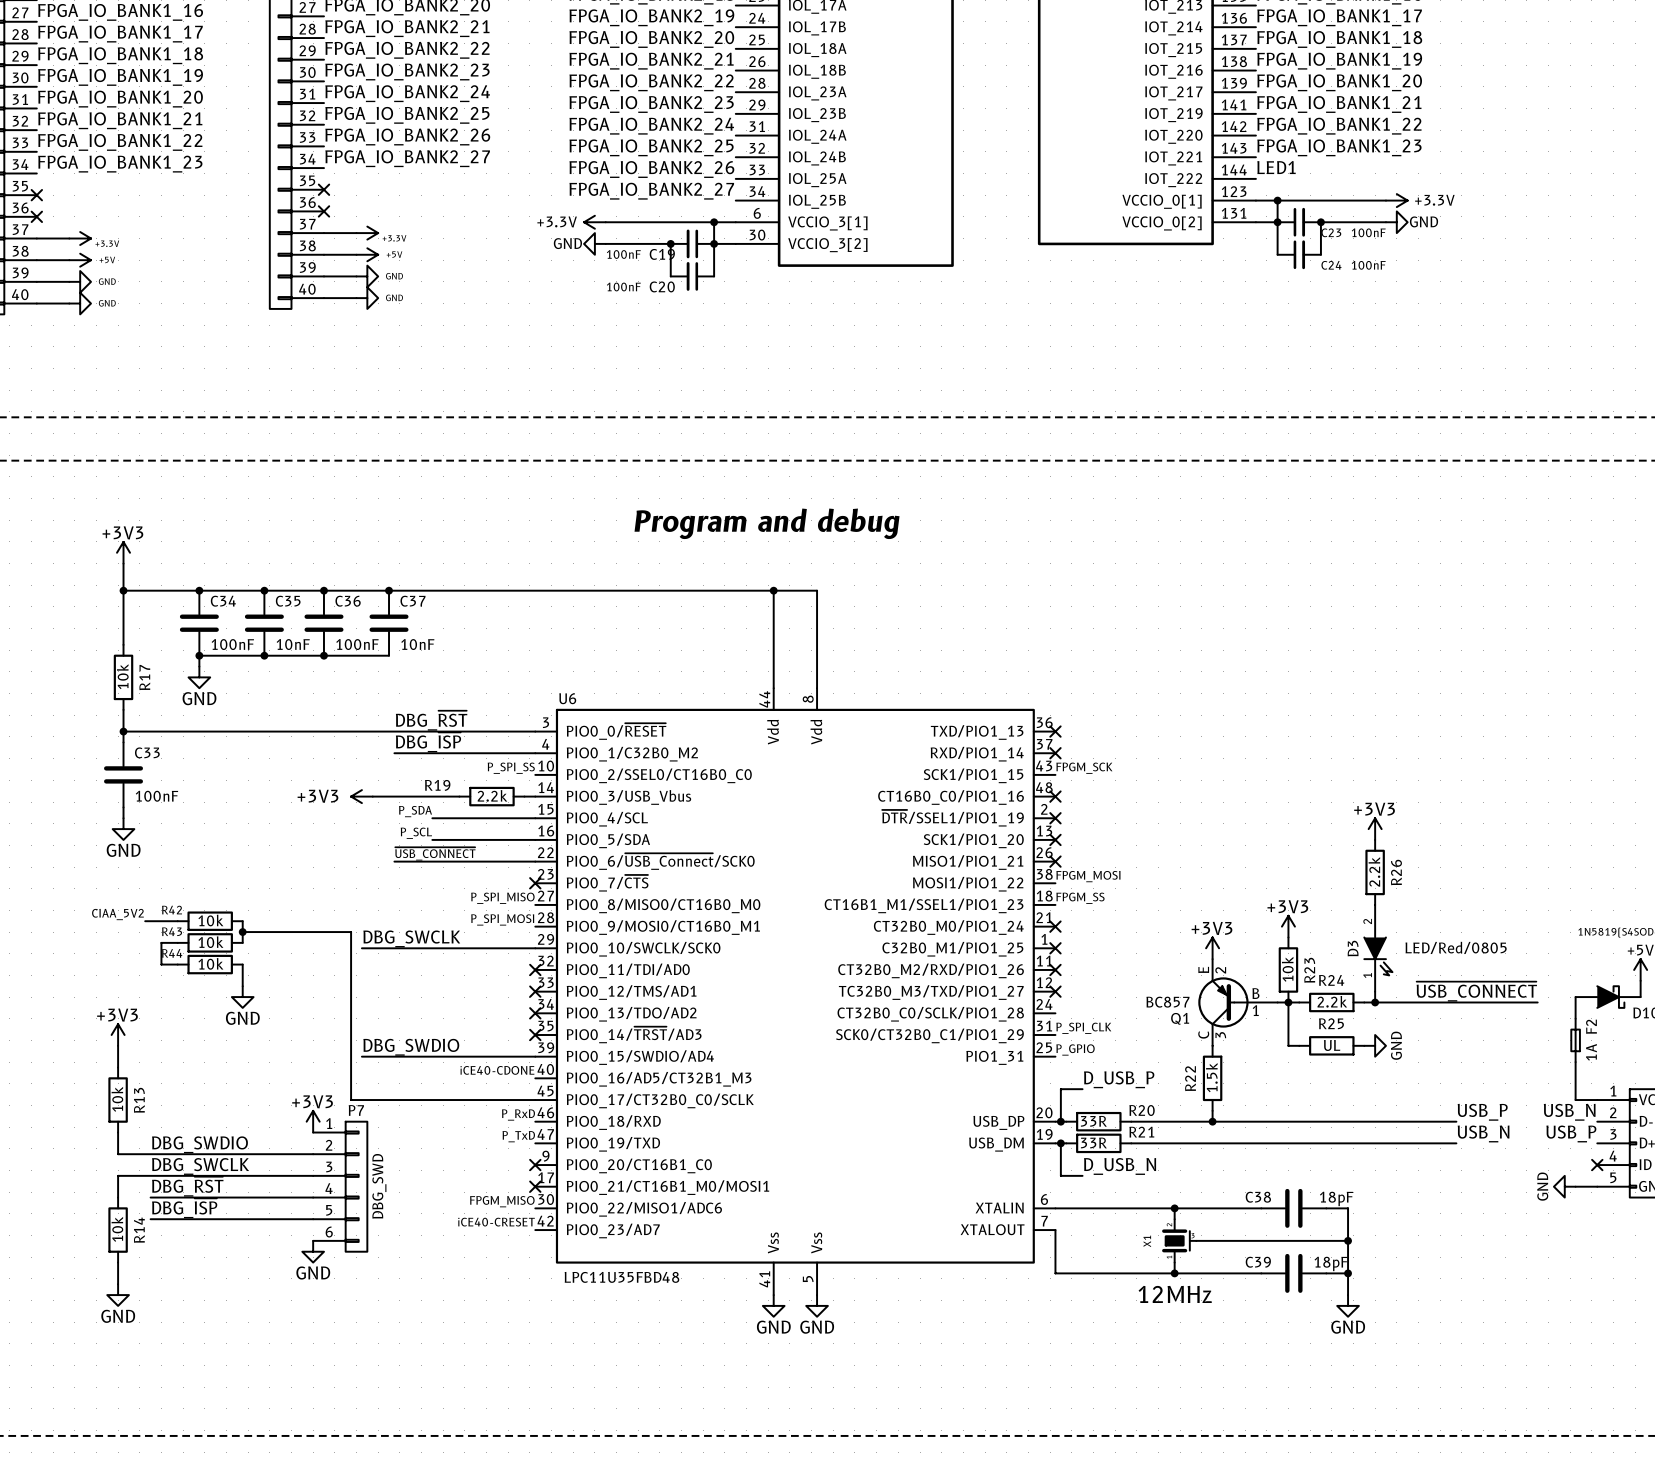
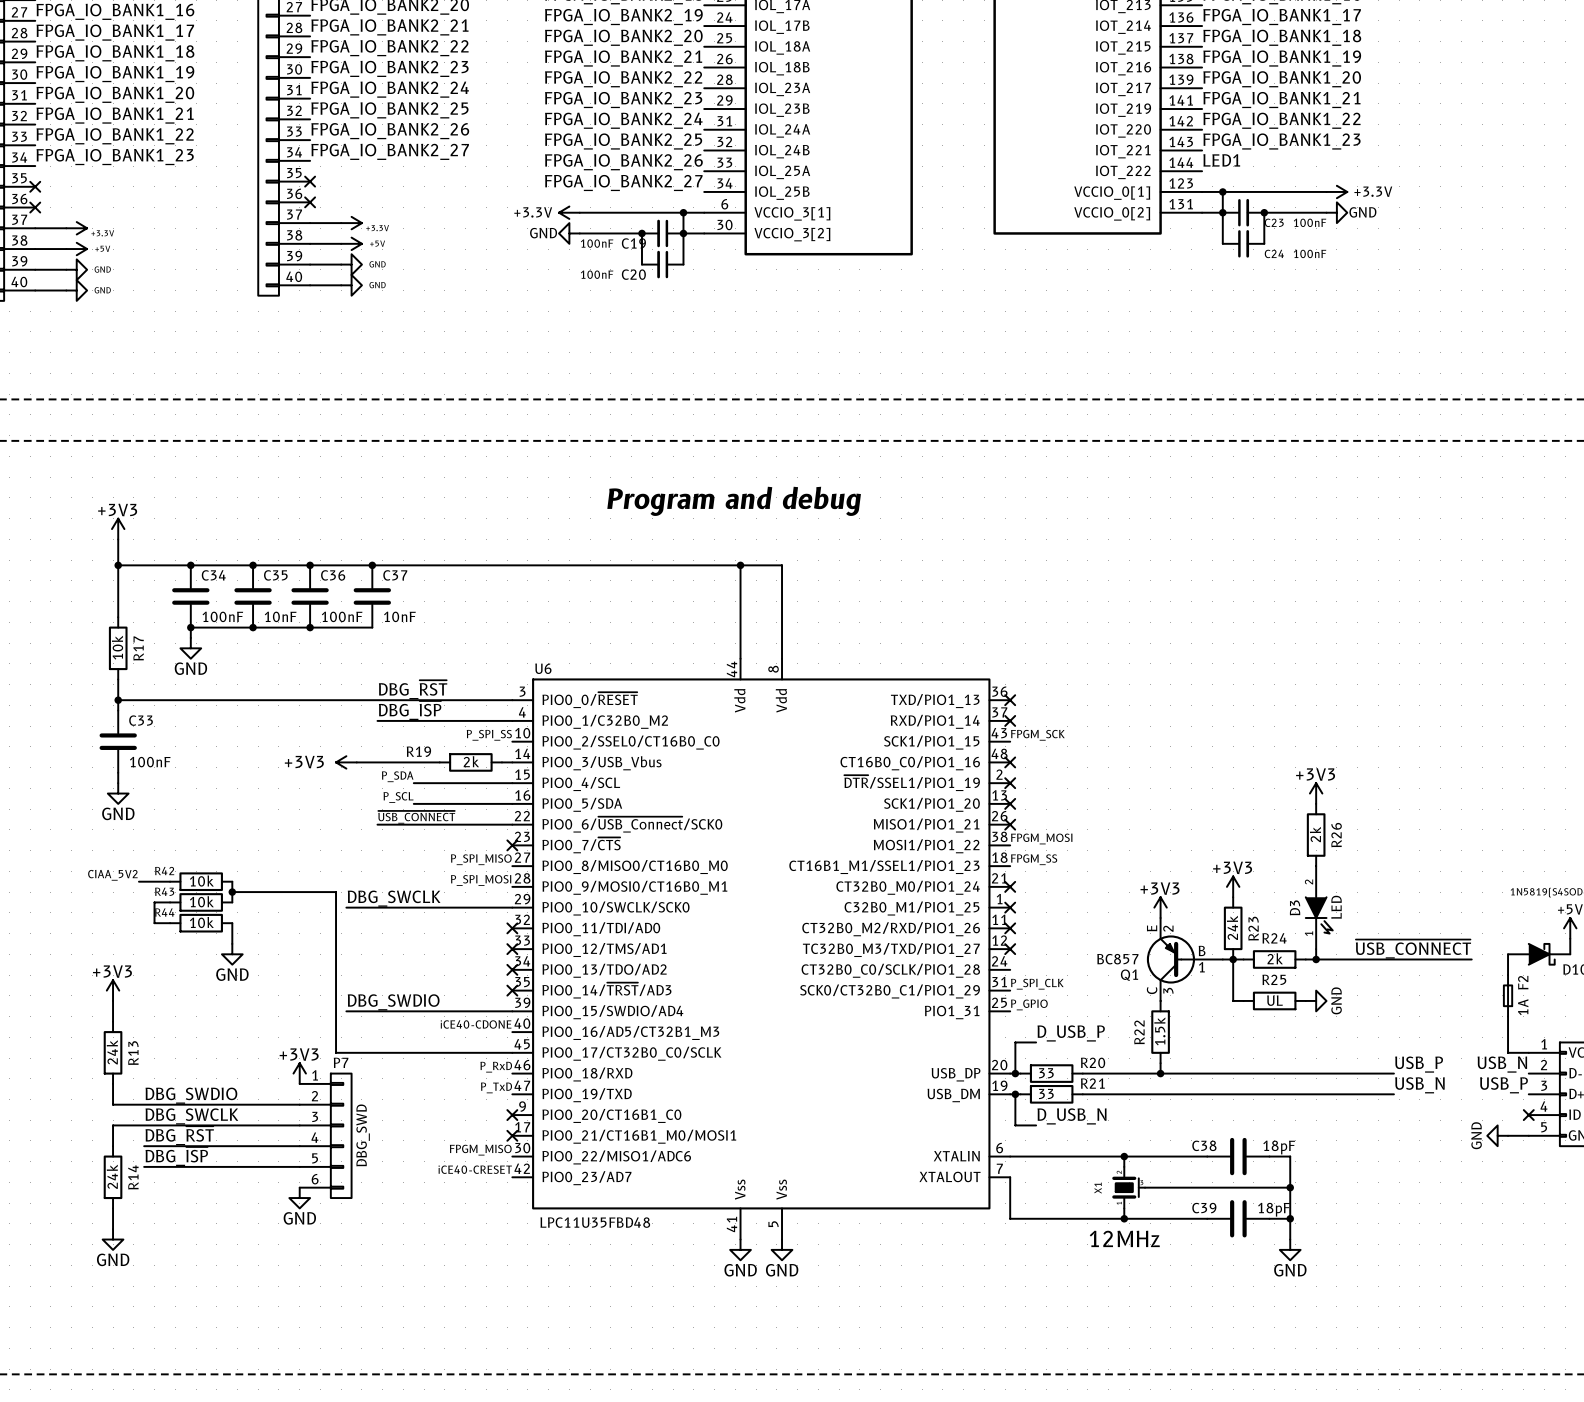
R19 value: 2.2k (492, 795) -> 2k (471, 761)
R26 value: 2.2k (1374, 871) -> 2k (1315, 834)
D3 value: LED/Red/0805 (1456, 947) -> LED (1336, 907)
R23 value: 10k (1287, 969) -> 24k (1232, 927)
R24 value: 2.2k (1332, 1001) -> 2k (1275, 958)
R13 value: 10k (117, 1099) -> 24k (112, 1052)
R20 value: 33R (1093, 1121) -> 33 (1046, 1073)
R21 value: 33R (1093, 1142) -> 33 (1046, 1094)
R14 value: 10k (117, 1229) -> 24k (112, 1176)

